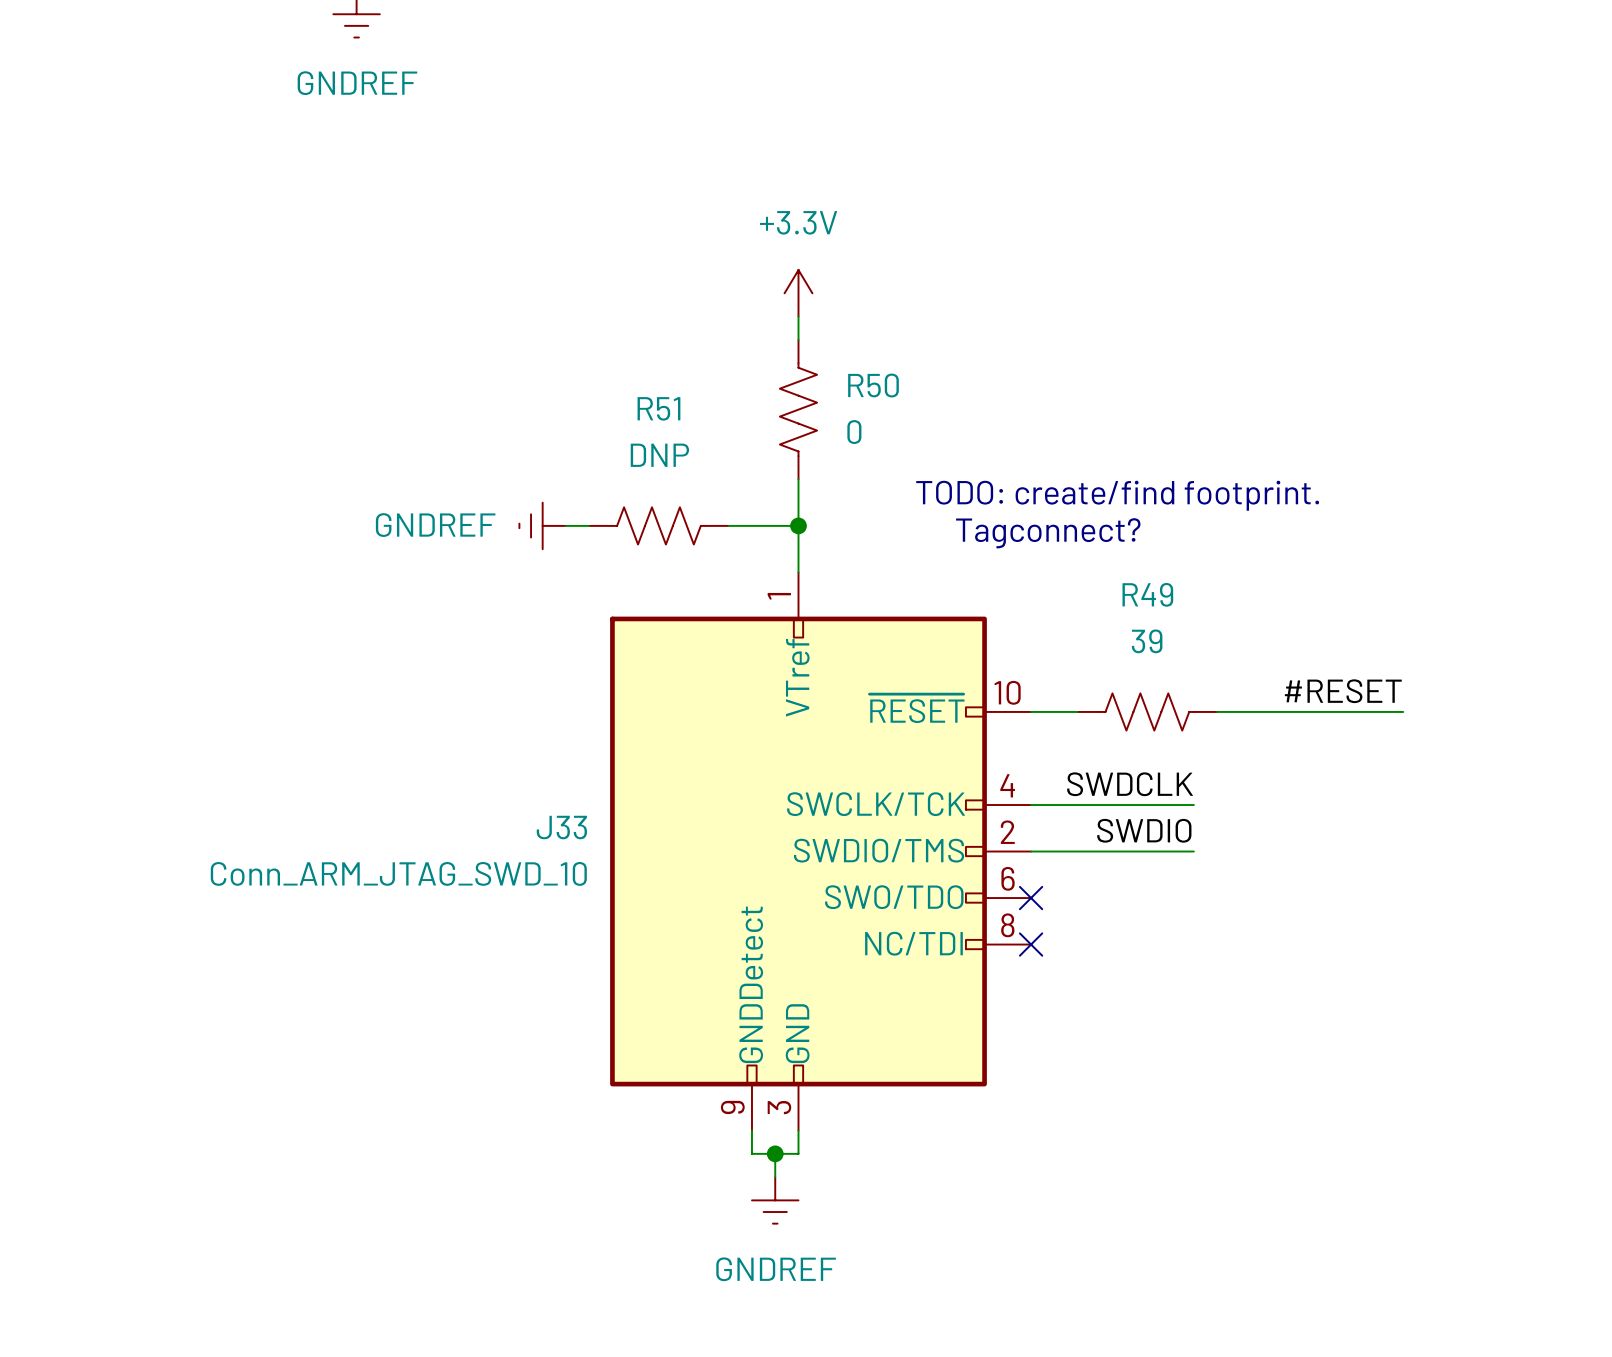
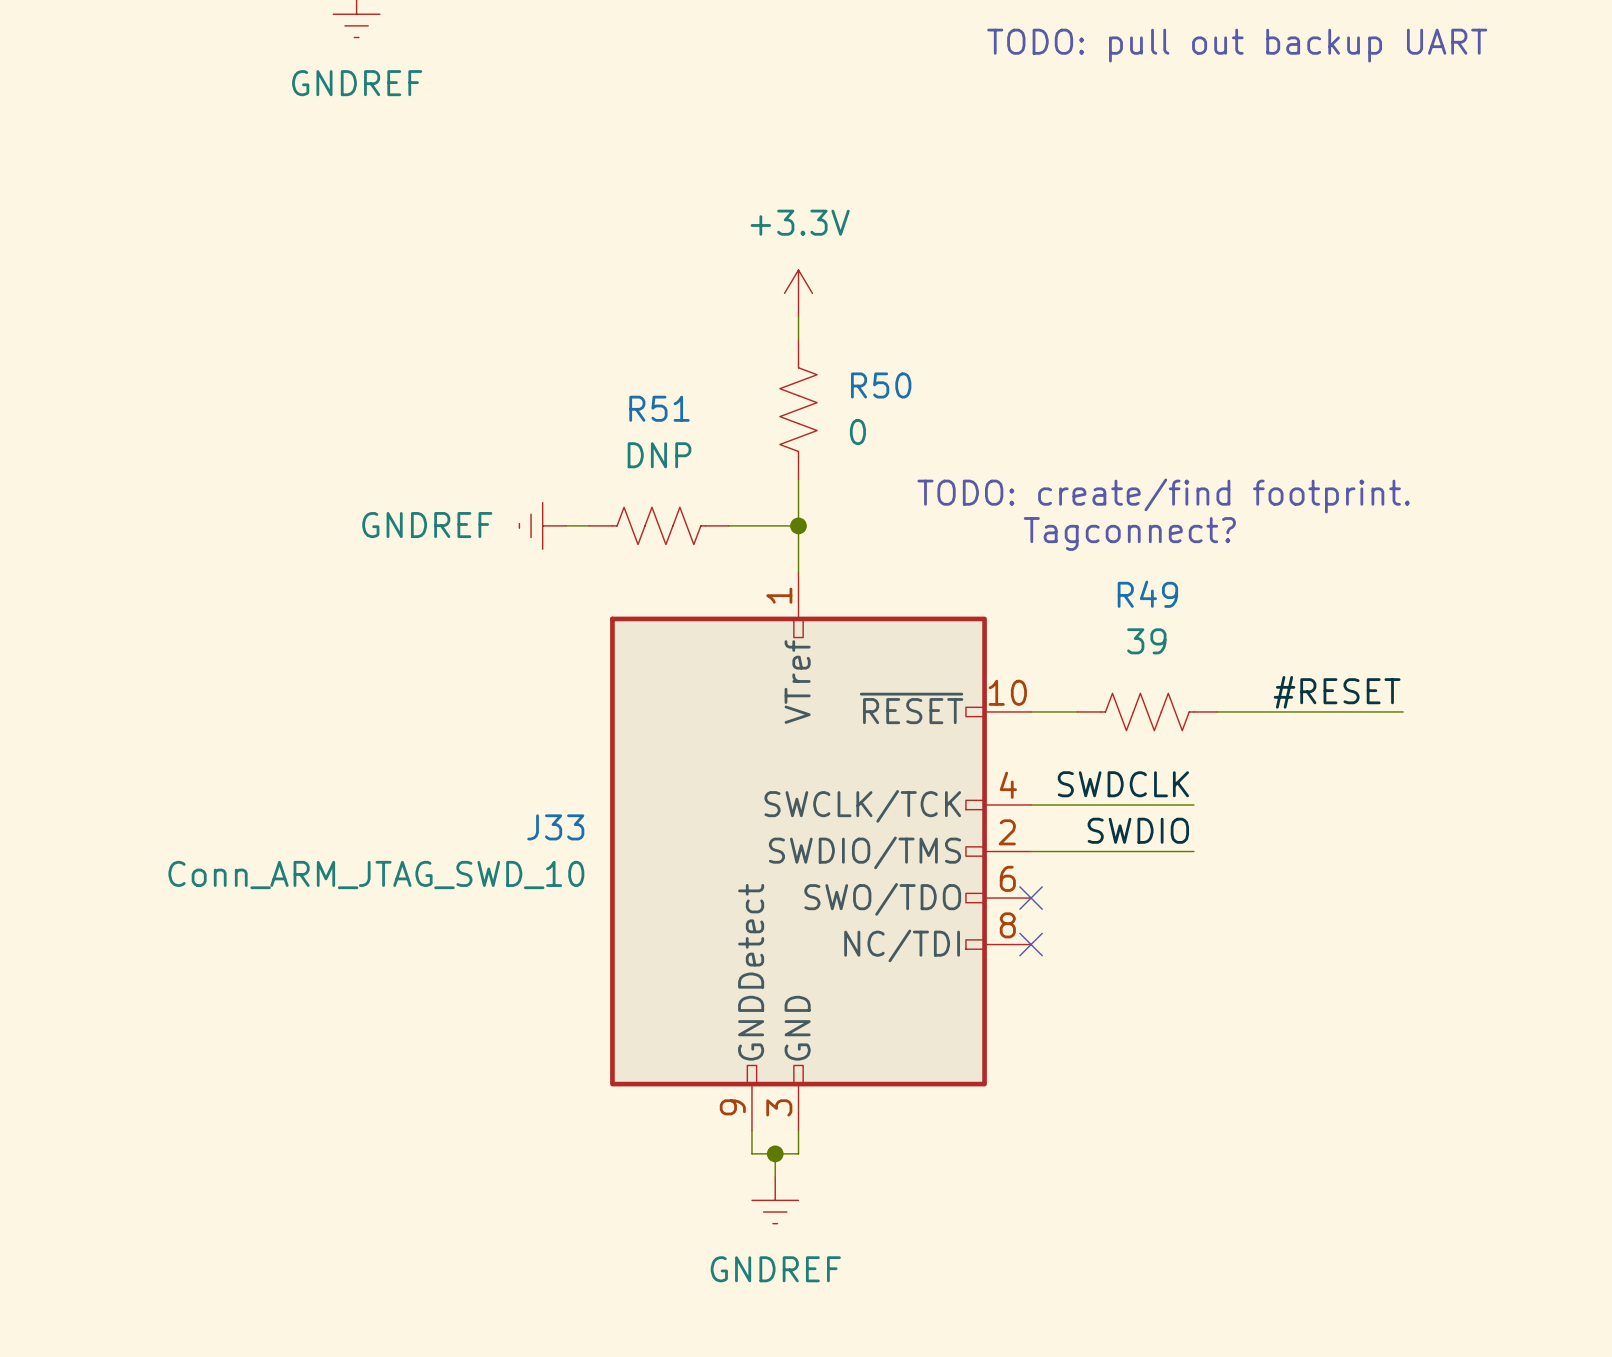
text: none -> TODO: pull out backup UART (1237, 45)

